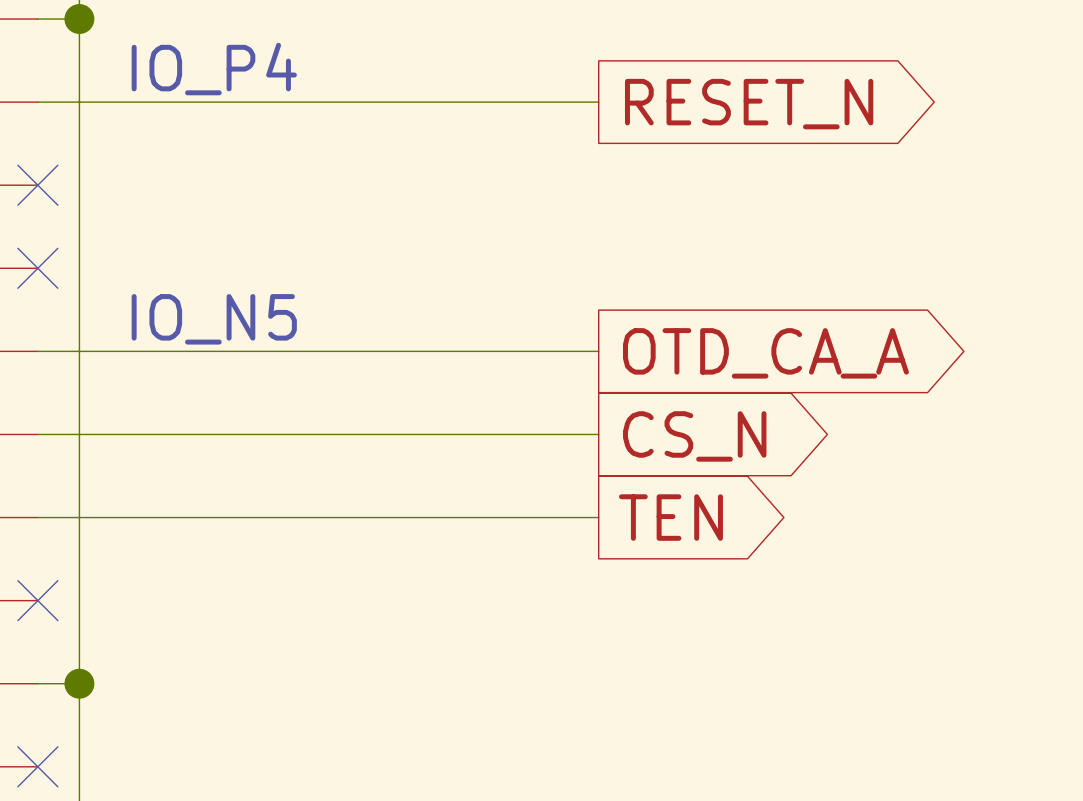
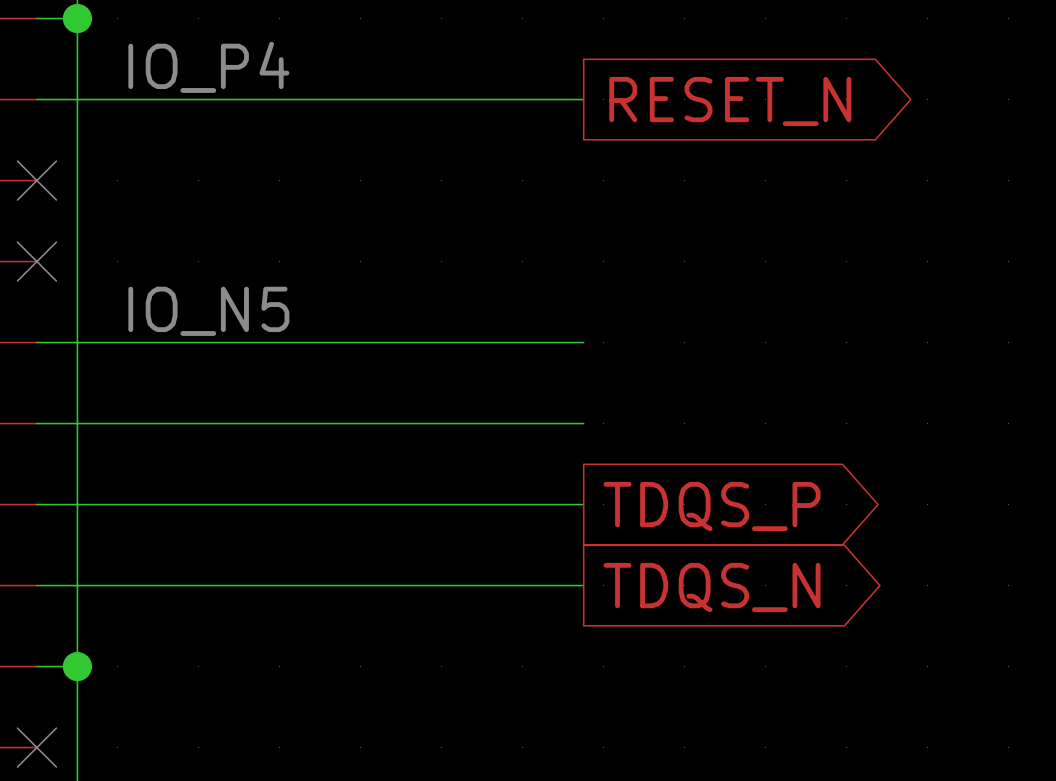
global label: OTD_CA_A (765, 353) -> none
global label: CS_N (694, 436) -> none
global label: TEN (670, 517) -> TDQS_P (712, 506)
wire: none -> (36, 585) (583, 585)
no-connect mark: (37, 600) -> none
global label: none -> TDQS_N (712, 587)

